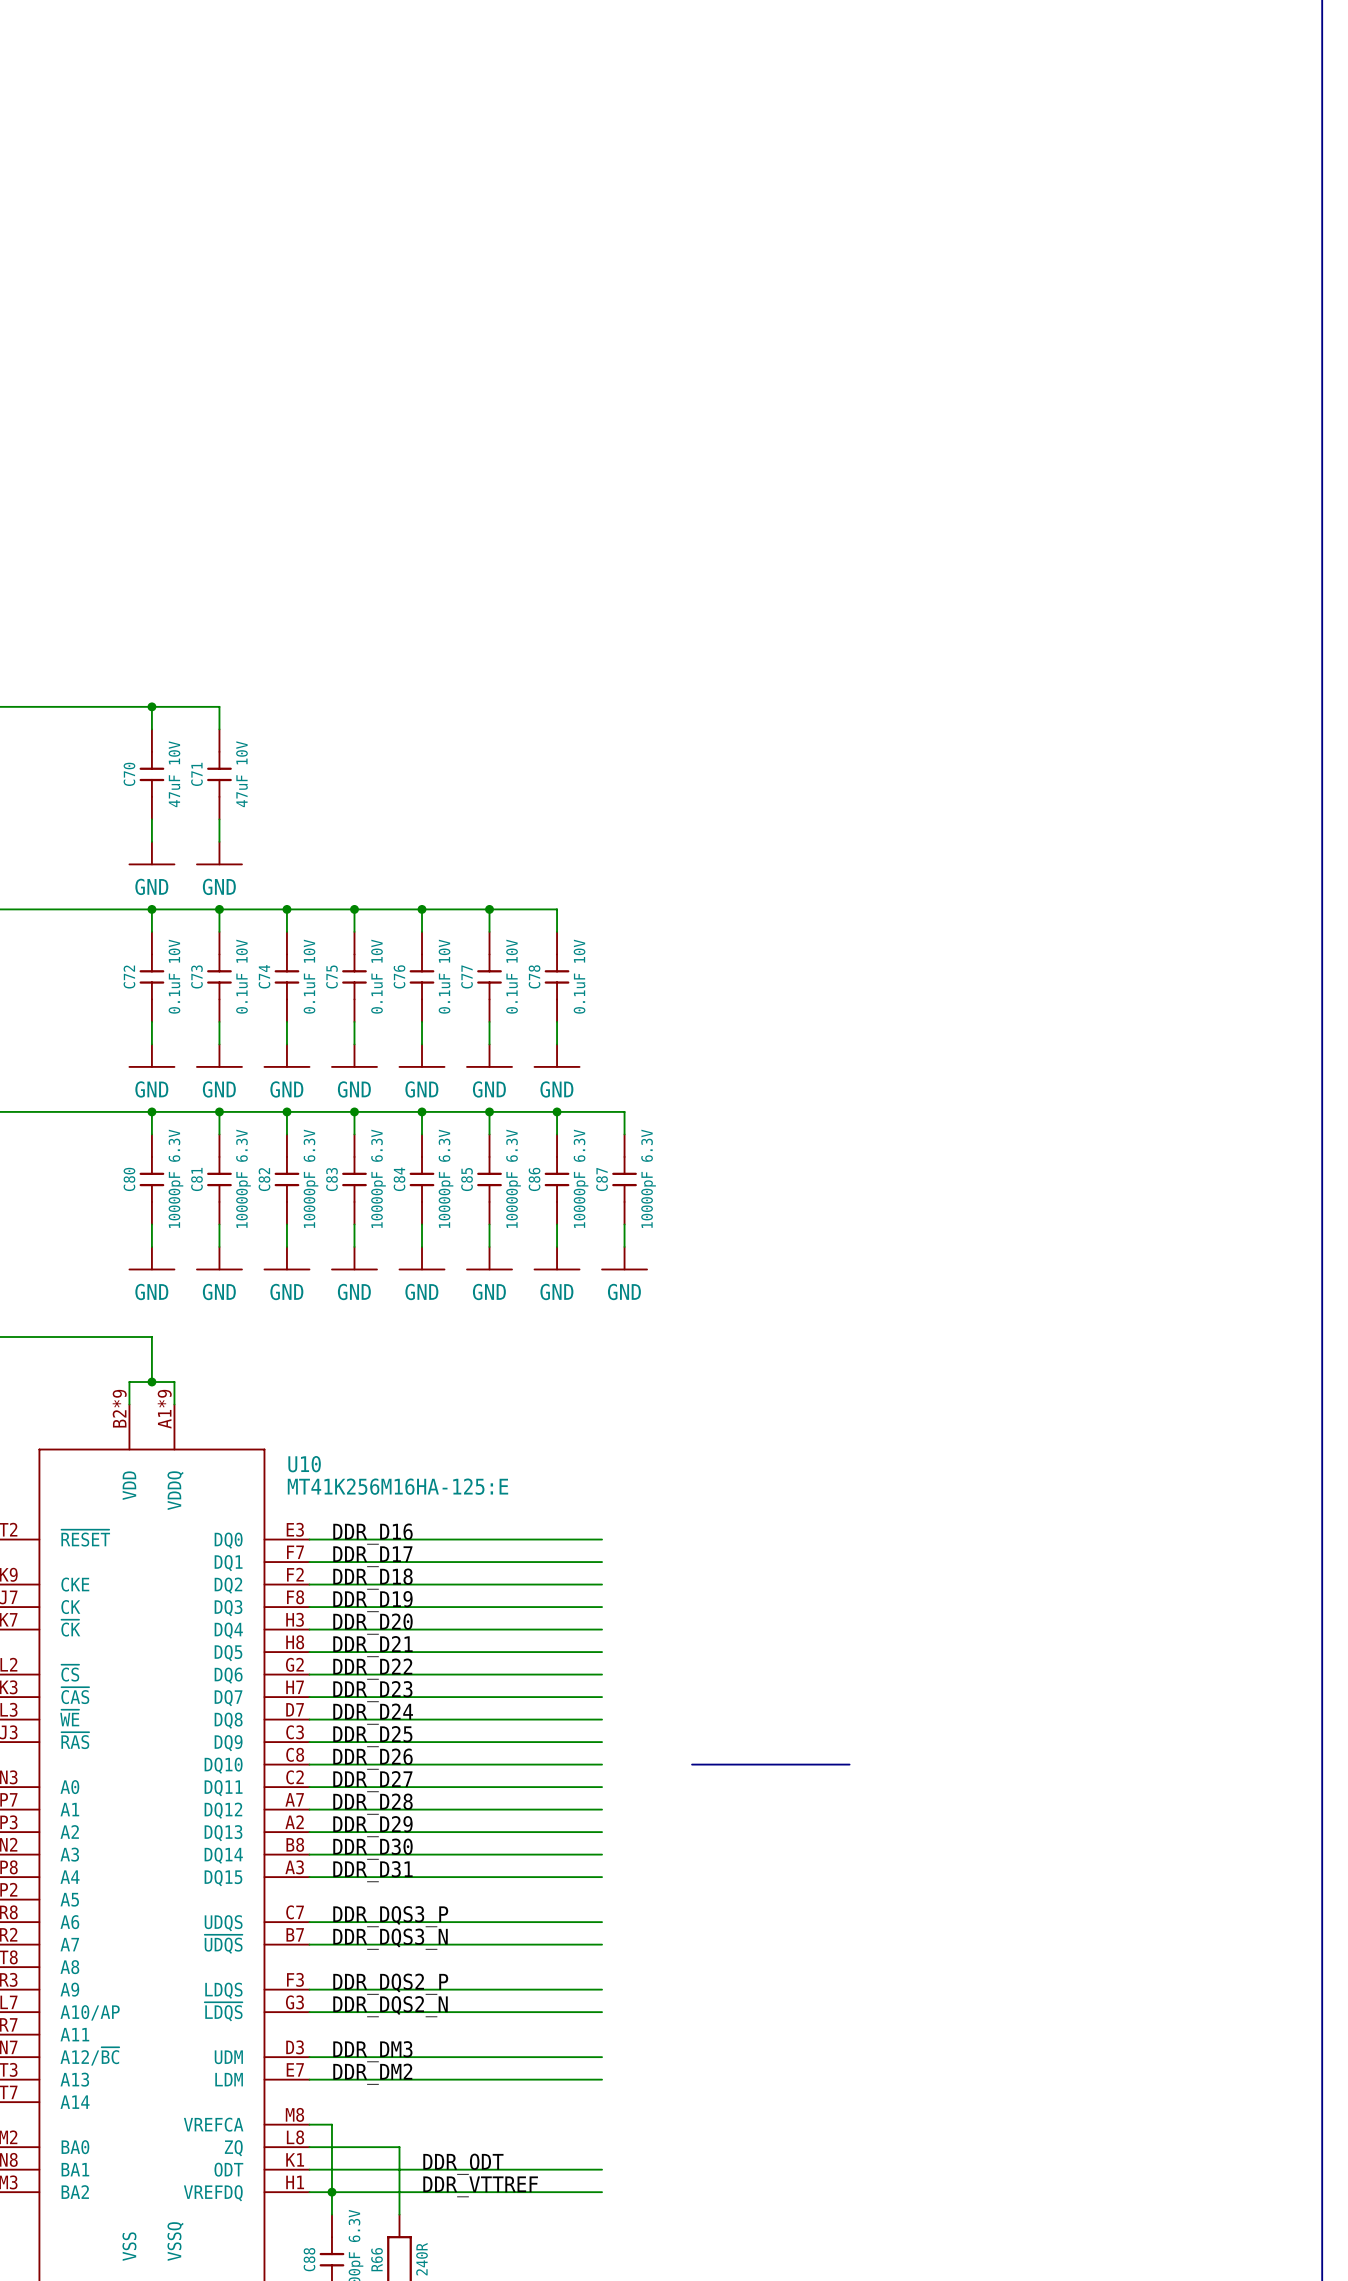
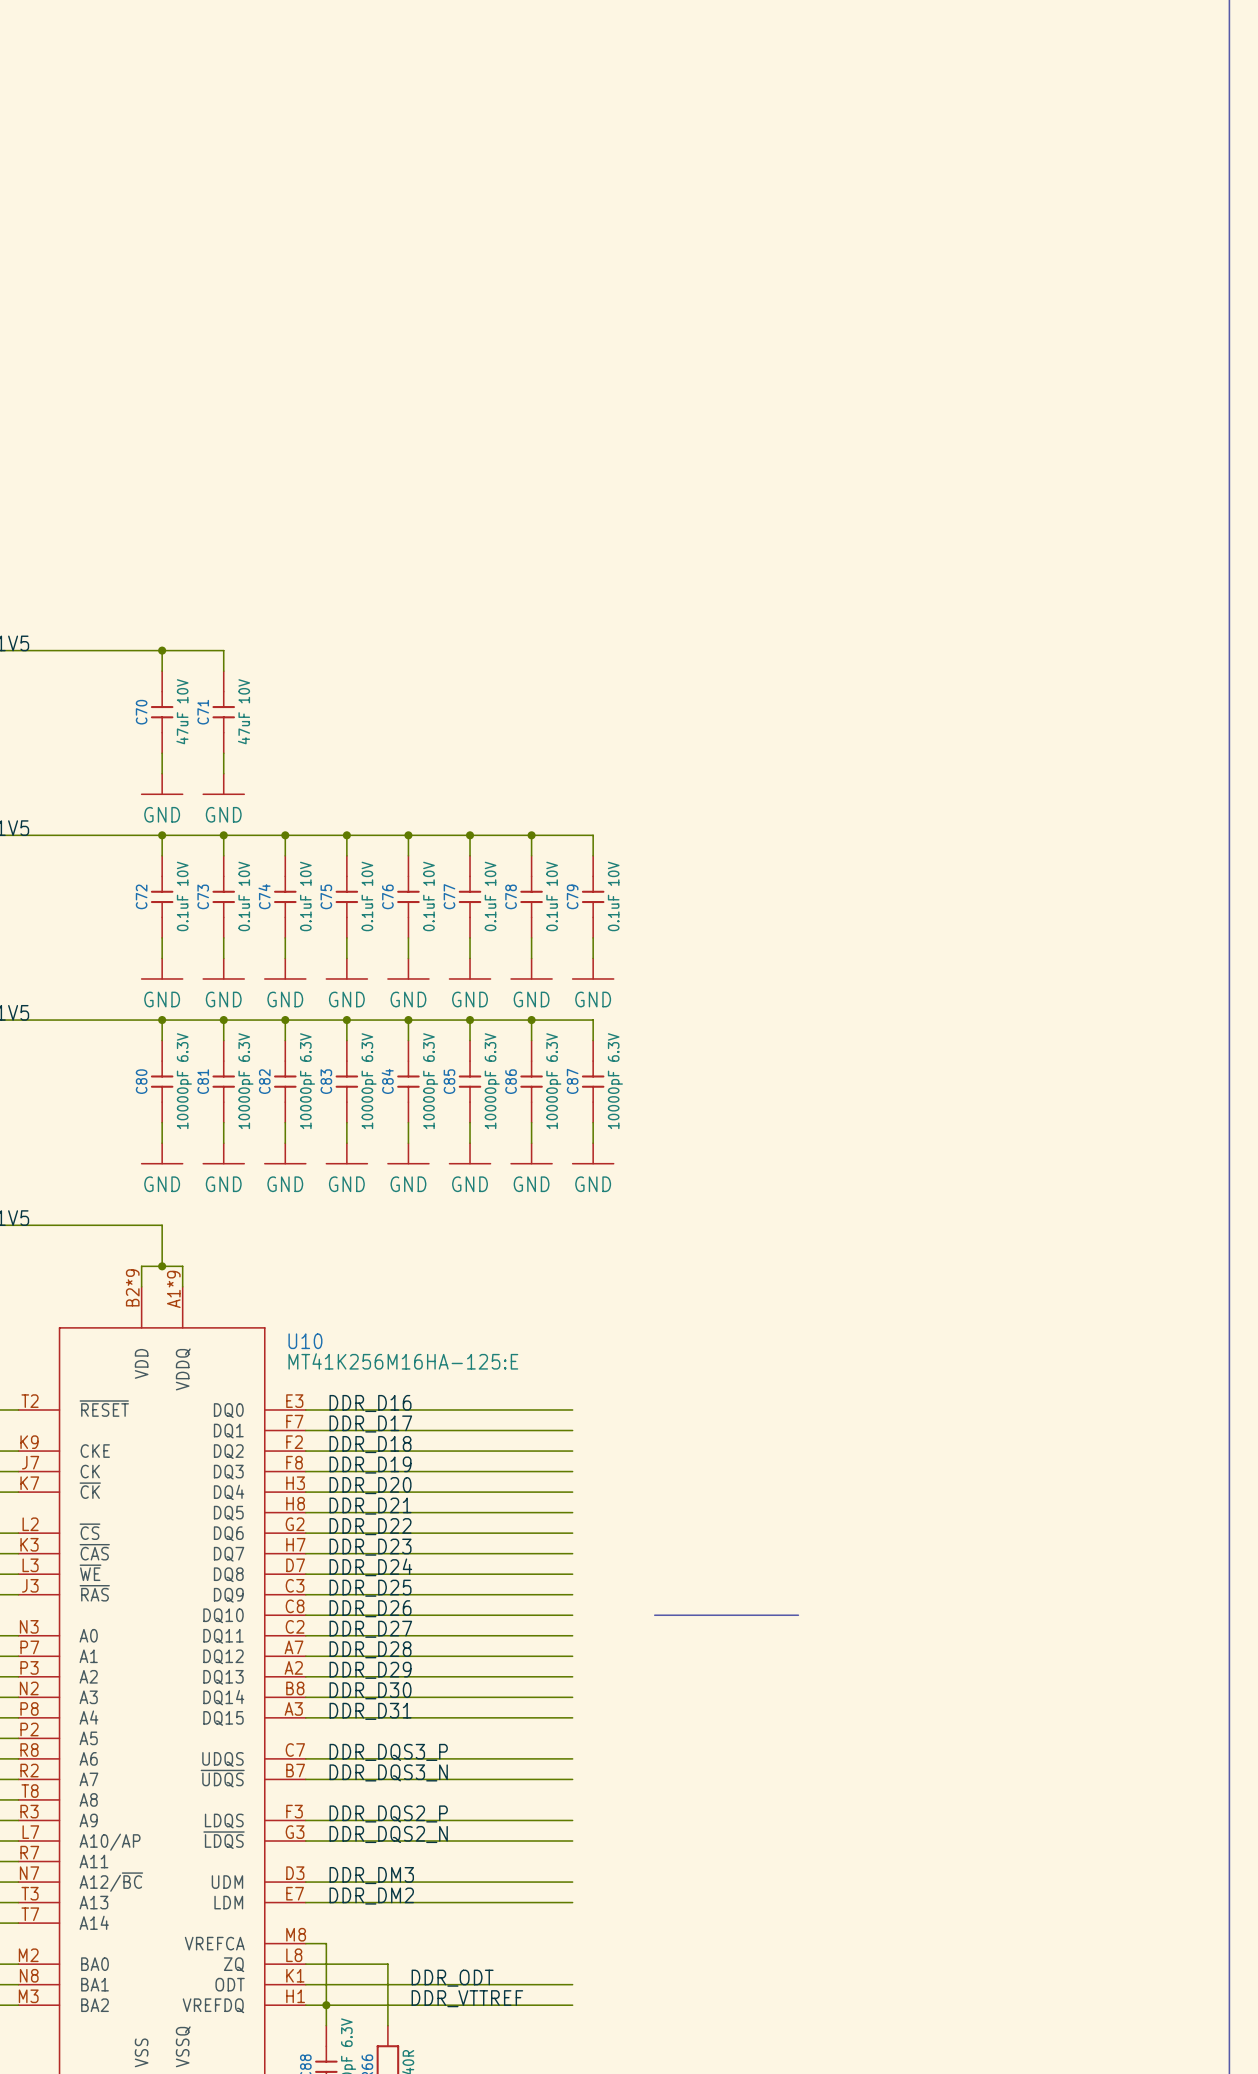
wire: none -> (531, 835) (593, 835) (593, 855)
junction: none -> (531, 835)
C79: none -> 0.1uF 10V (593, 896)
wire: none -> (593, 937) (593, 958)
power symbol: none -> GND (593, 969)

